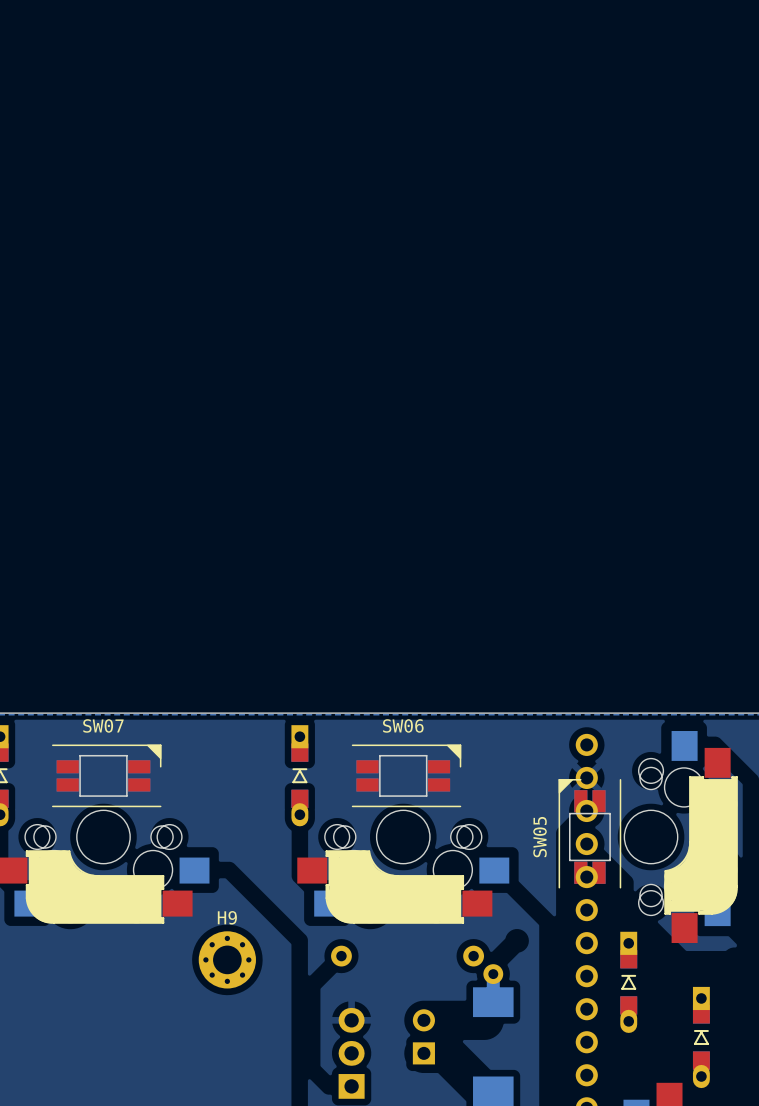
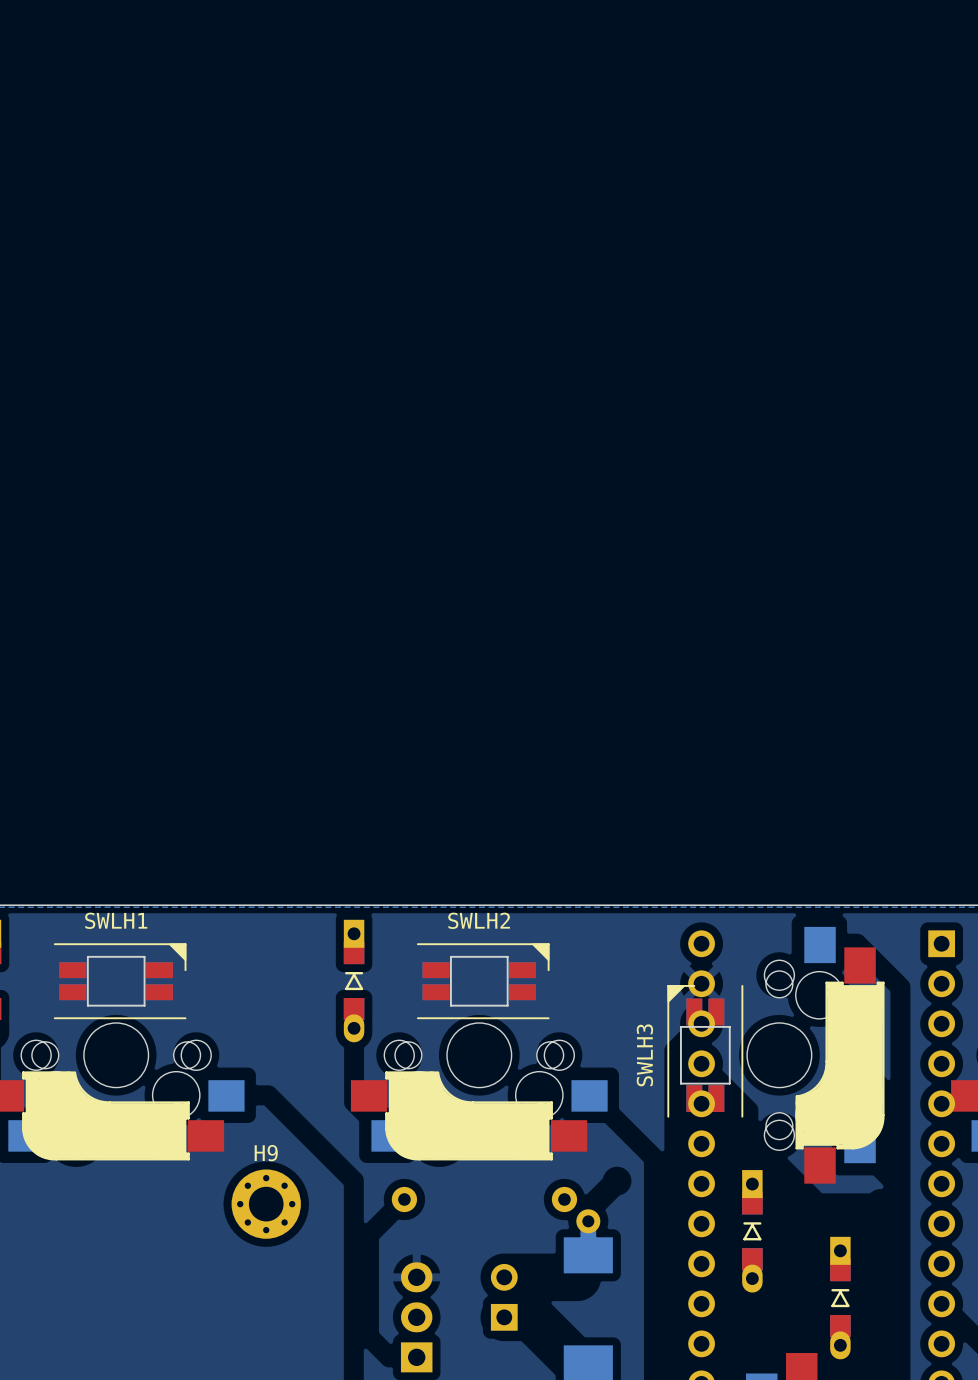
SW07 name: SW07 (103, 725) -> SWLH1 (116, 920)
SW06 name: SW06 (403, 725) -> SWLH2 (479, 920)
SW05 name: SW05 (540, 837) -> SWLH3 (644, 1055)

